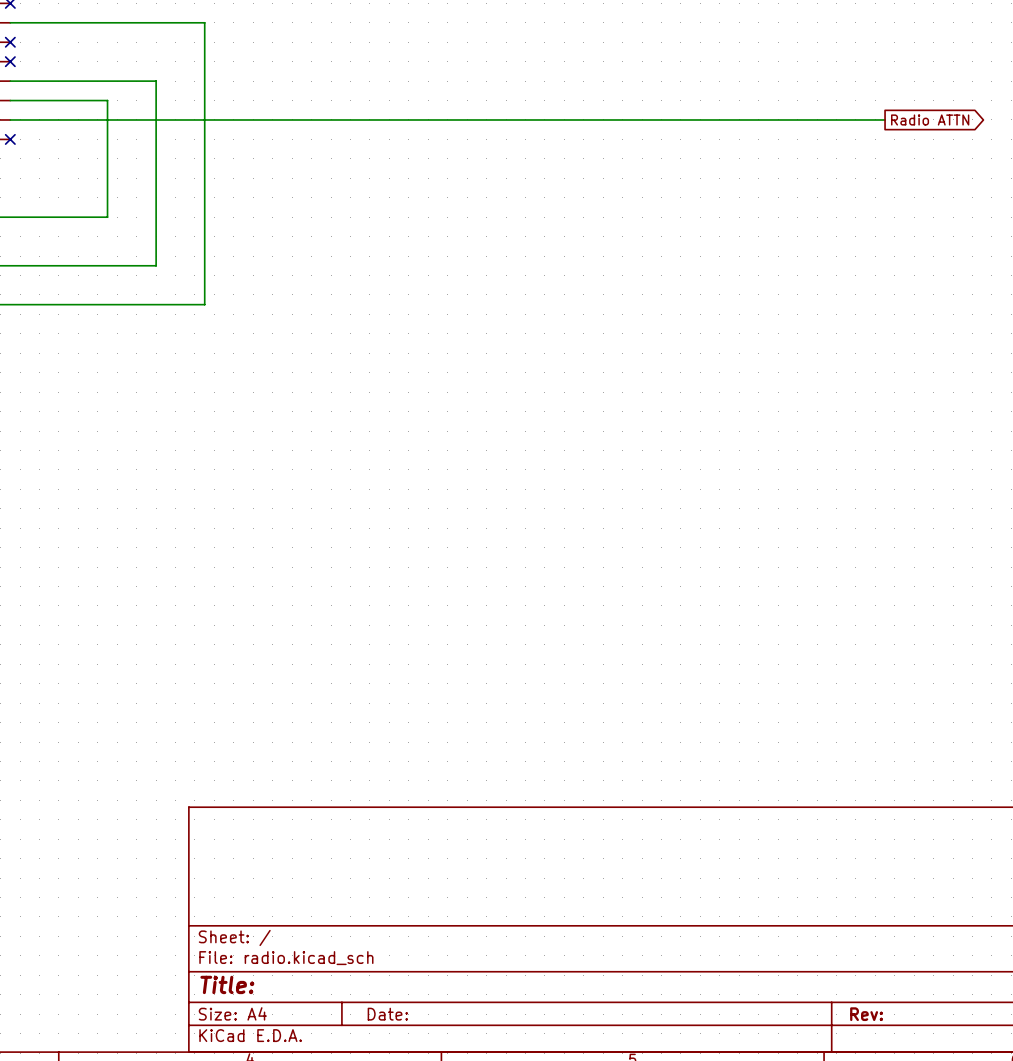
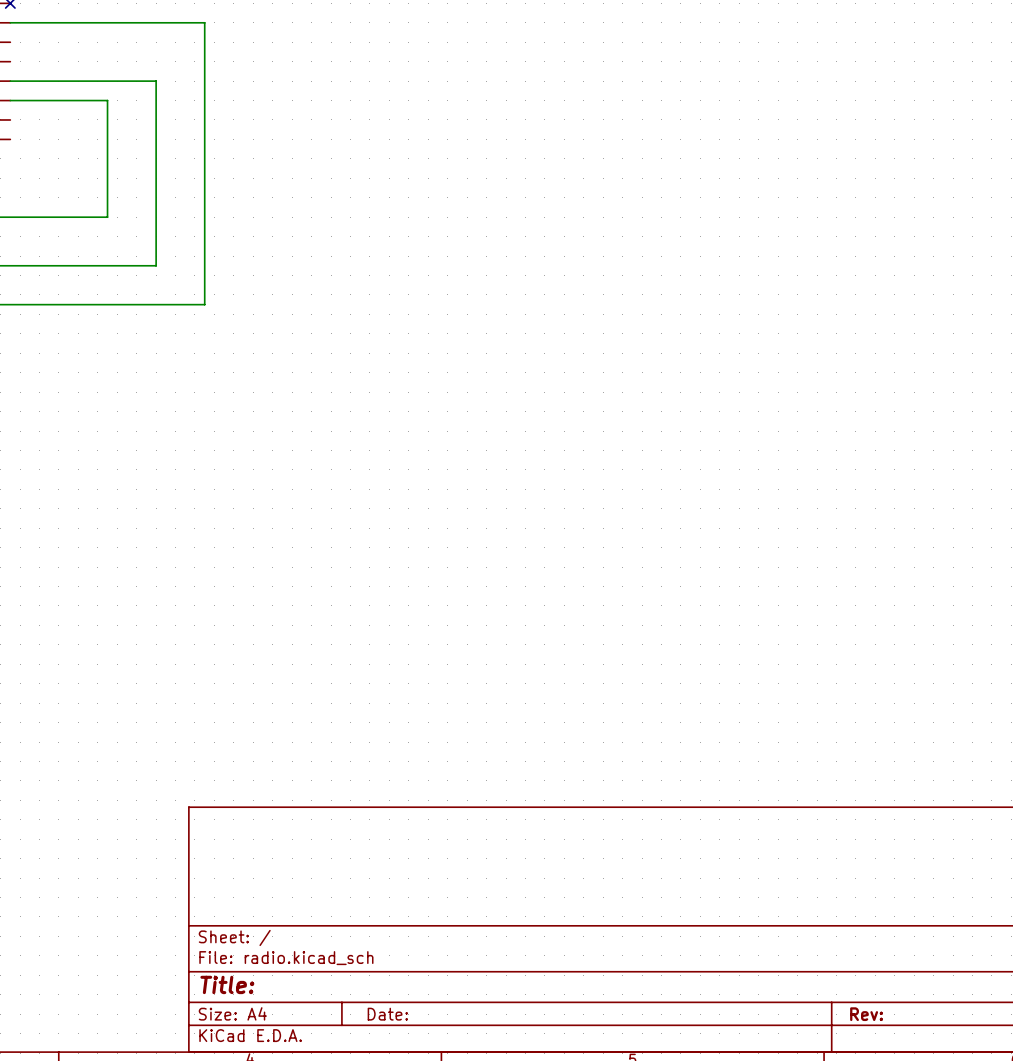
no-connect mark: (10, 42) -> none
no-connect mark: (10, 61) -> none
wire: (10, 119) (885, 119) -> none
global label: Radio ATTN (930, 119) -> none
no-connect mark: (10, 139) -> none

